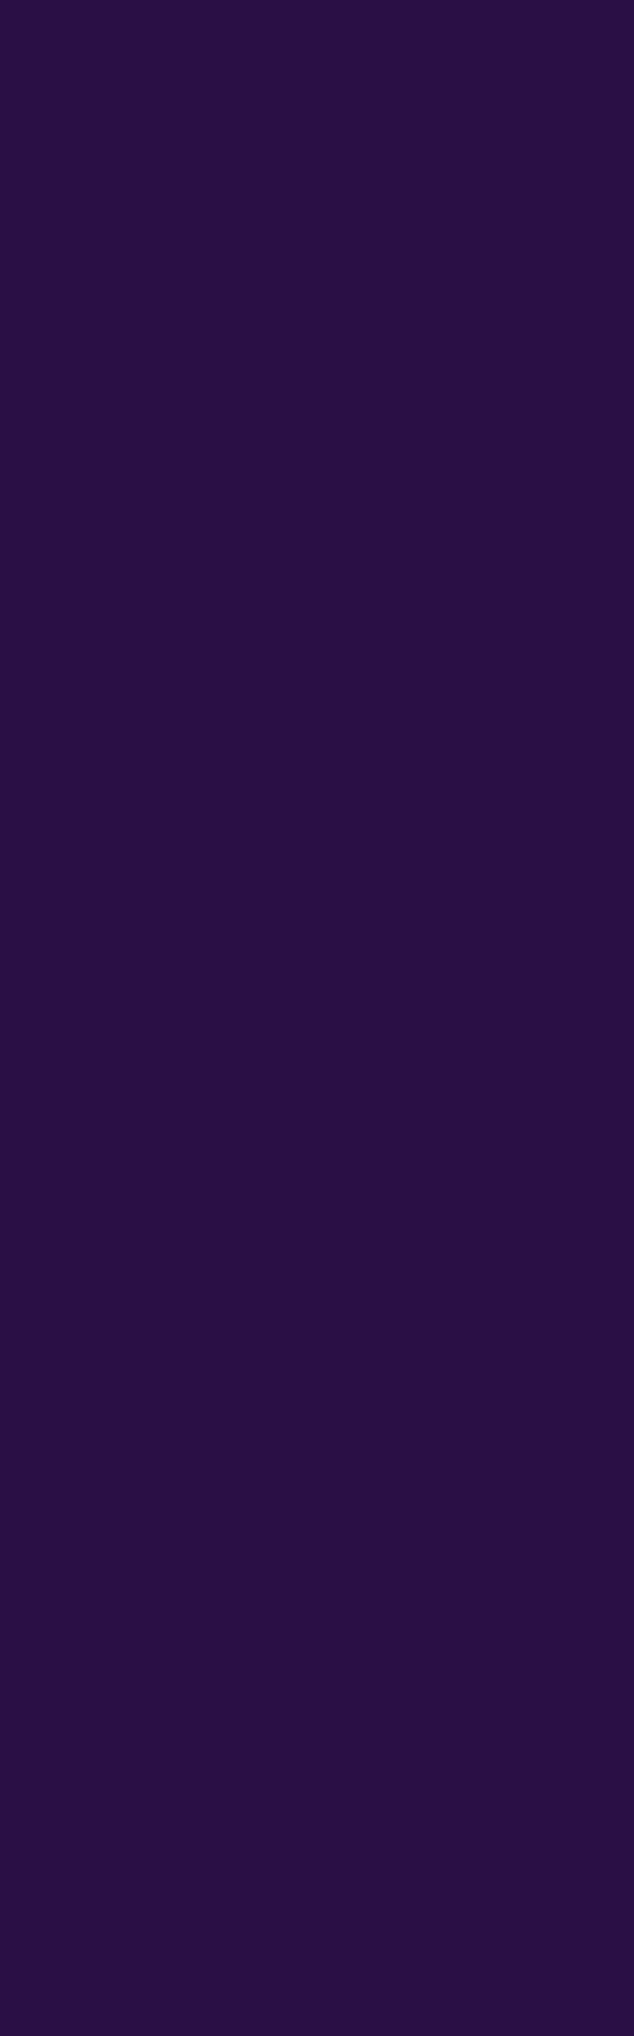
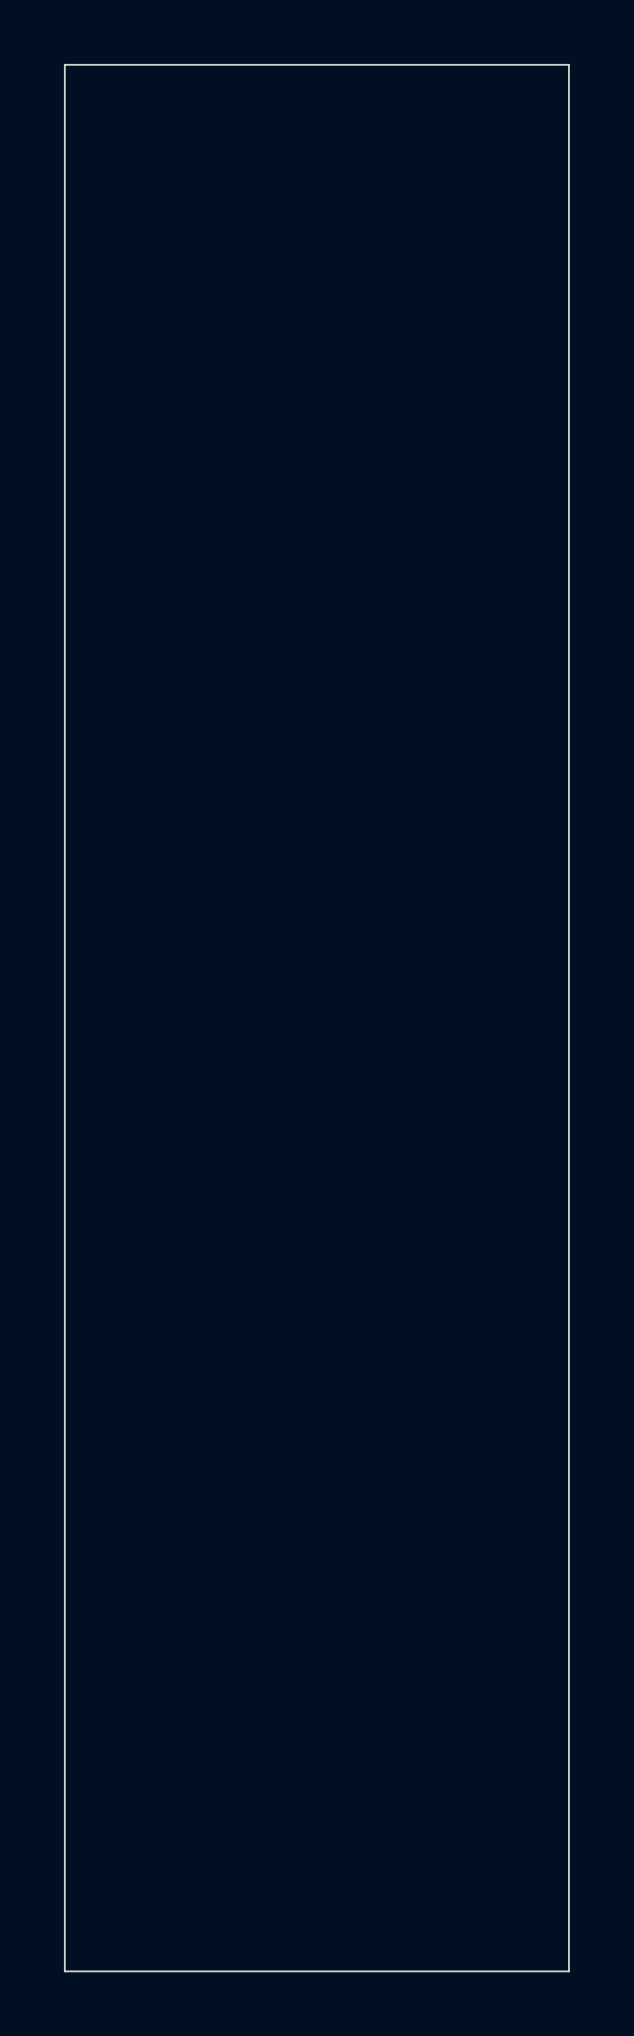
board edge: none -> (64, 64) (64, 1971) (568, 1971) (568, 64) (64, 64)

